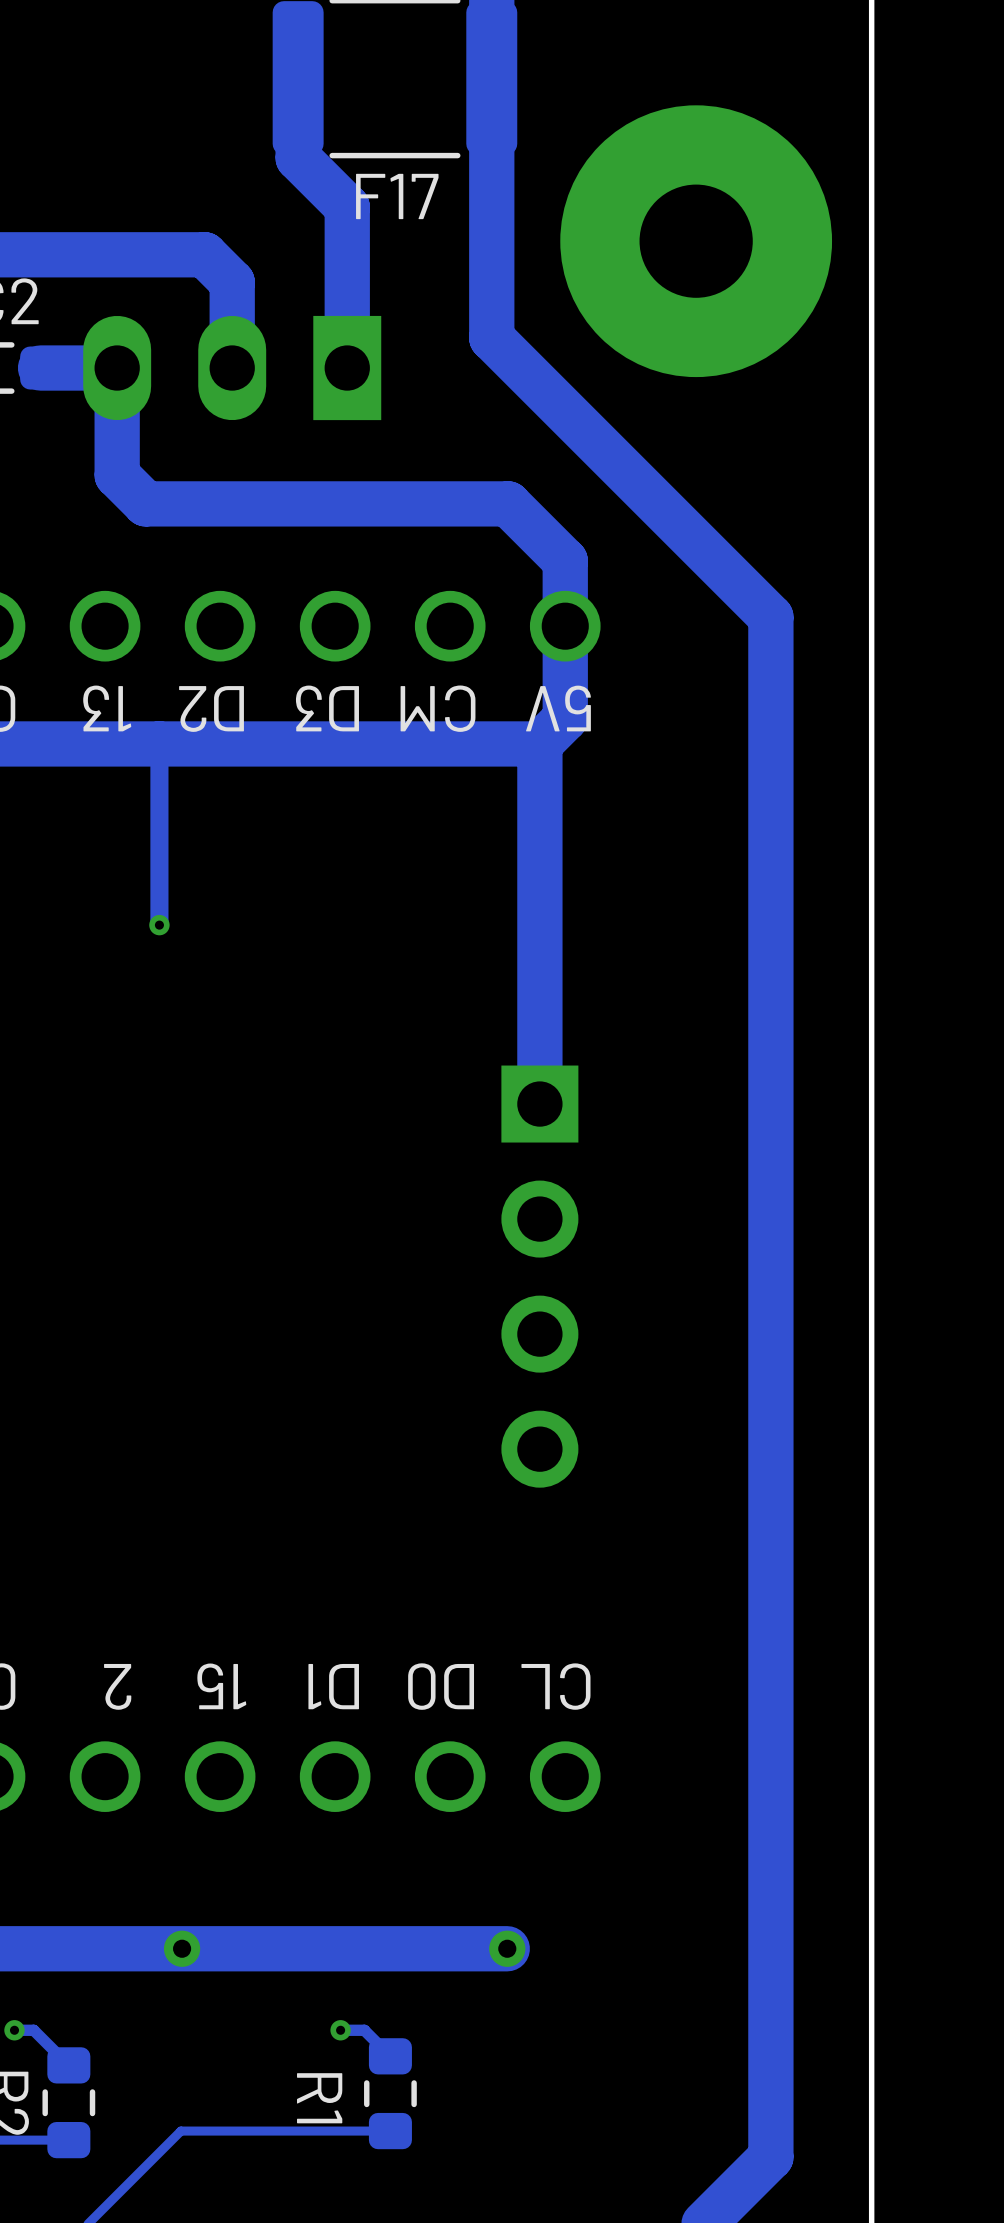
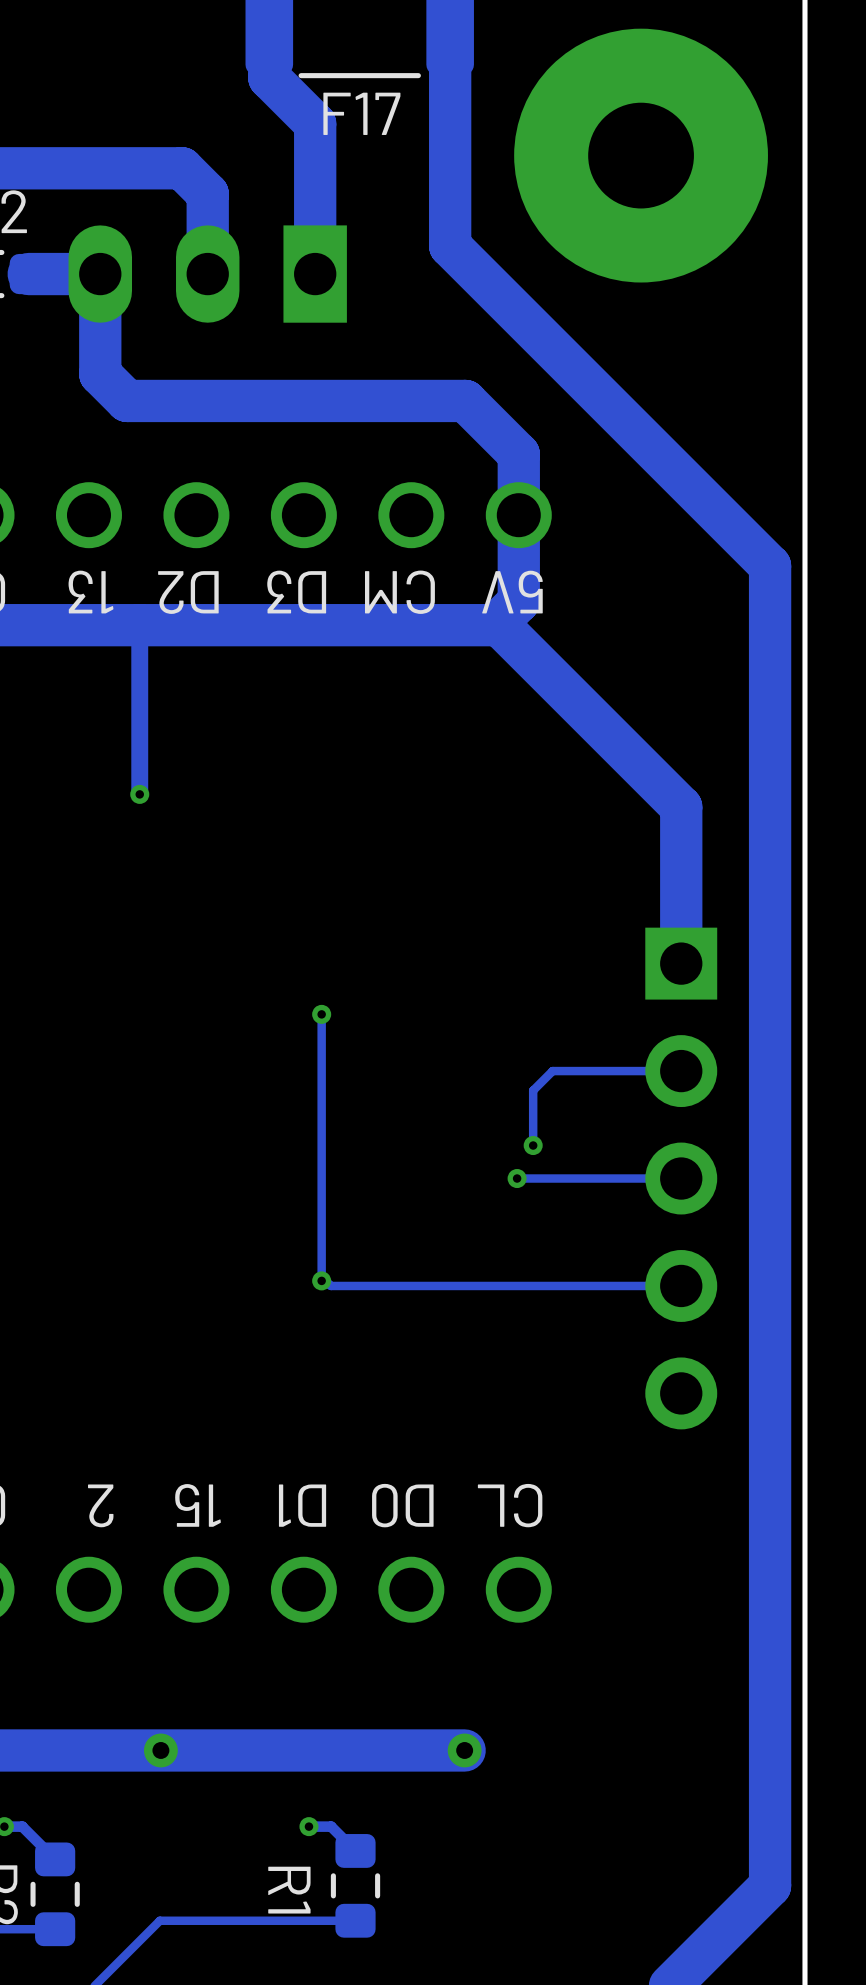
track: (770, 617) (770, 2157) -> (710, 506) (770, 565) (770, 1885) (710, 1945)
track: (539, 743) (539, 1104) -> (495, 625) (499, 625) (681, 807) (681, 963)
track: none -> (321, 1014) (321, 1280) (325, 1280) (330, 1285) (681, 1285)
via: none -> (321, 1014)
track: none -> (681, 1071) (552, 1071) (533, 1090) (533, 1145)
part: (539, 1276) -> none
via: none -> (533, 1145)
via: none -> (517, 1178)
track: none -> (681, 1178) (516, 1179)
part: none -> (681, 1178)
via: none -> (321, 1280)

